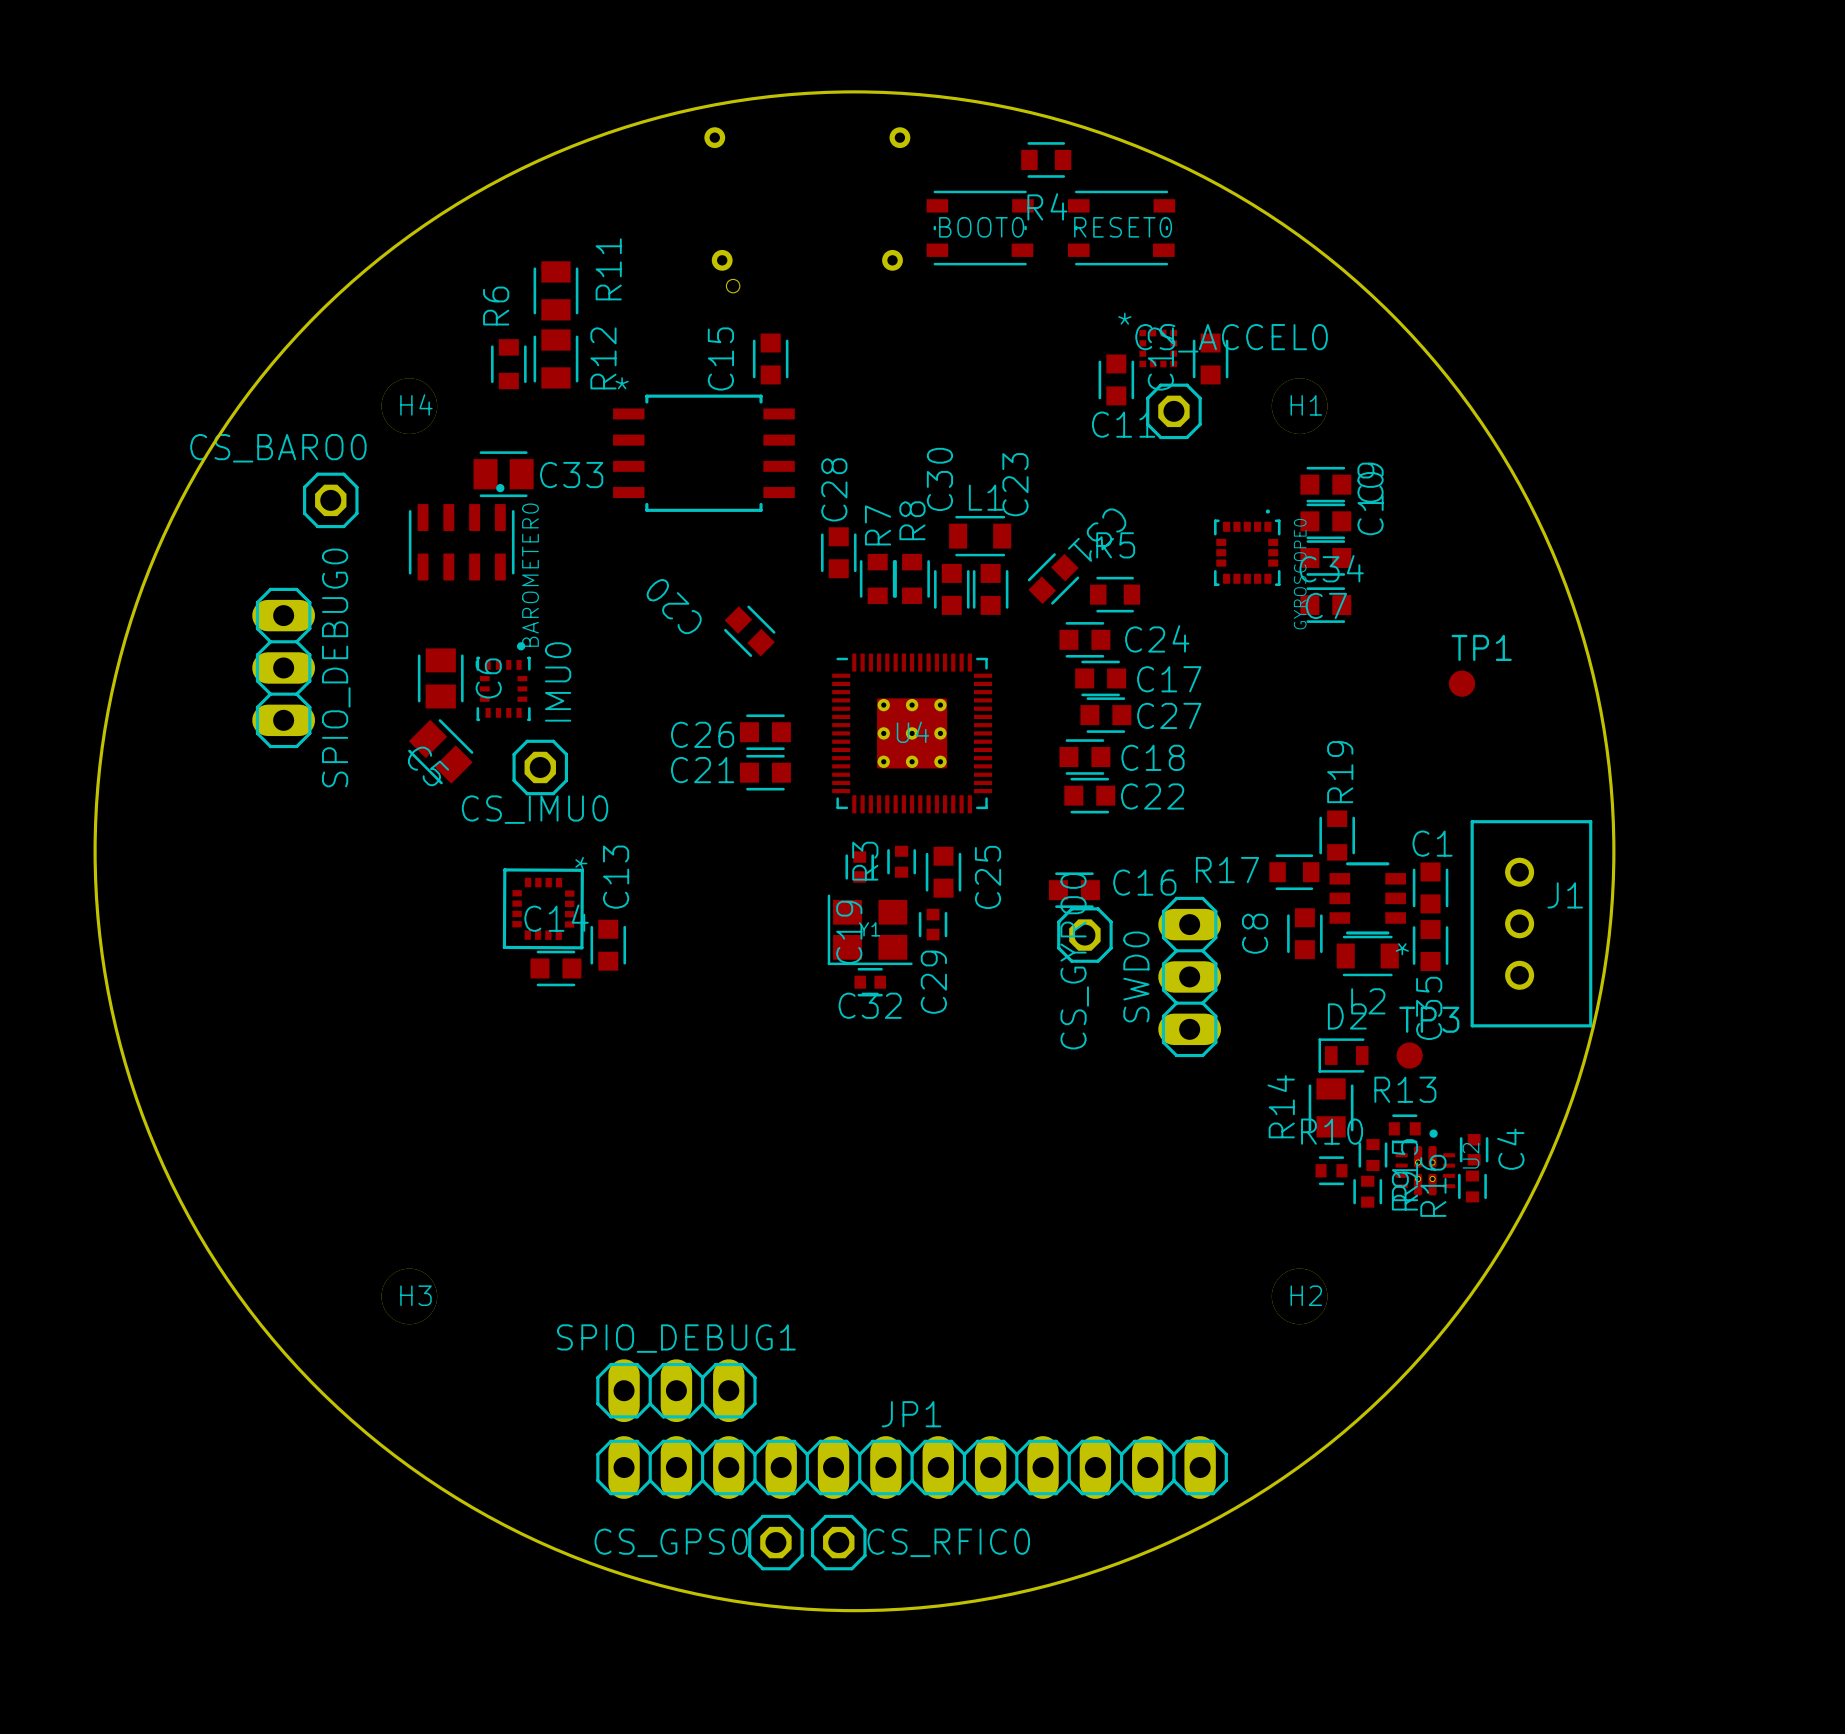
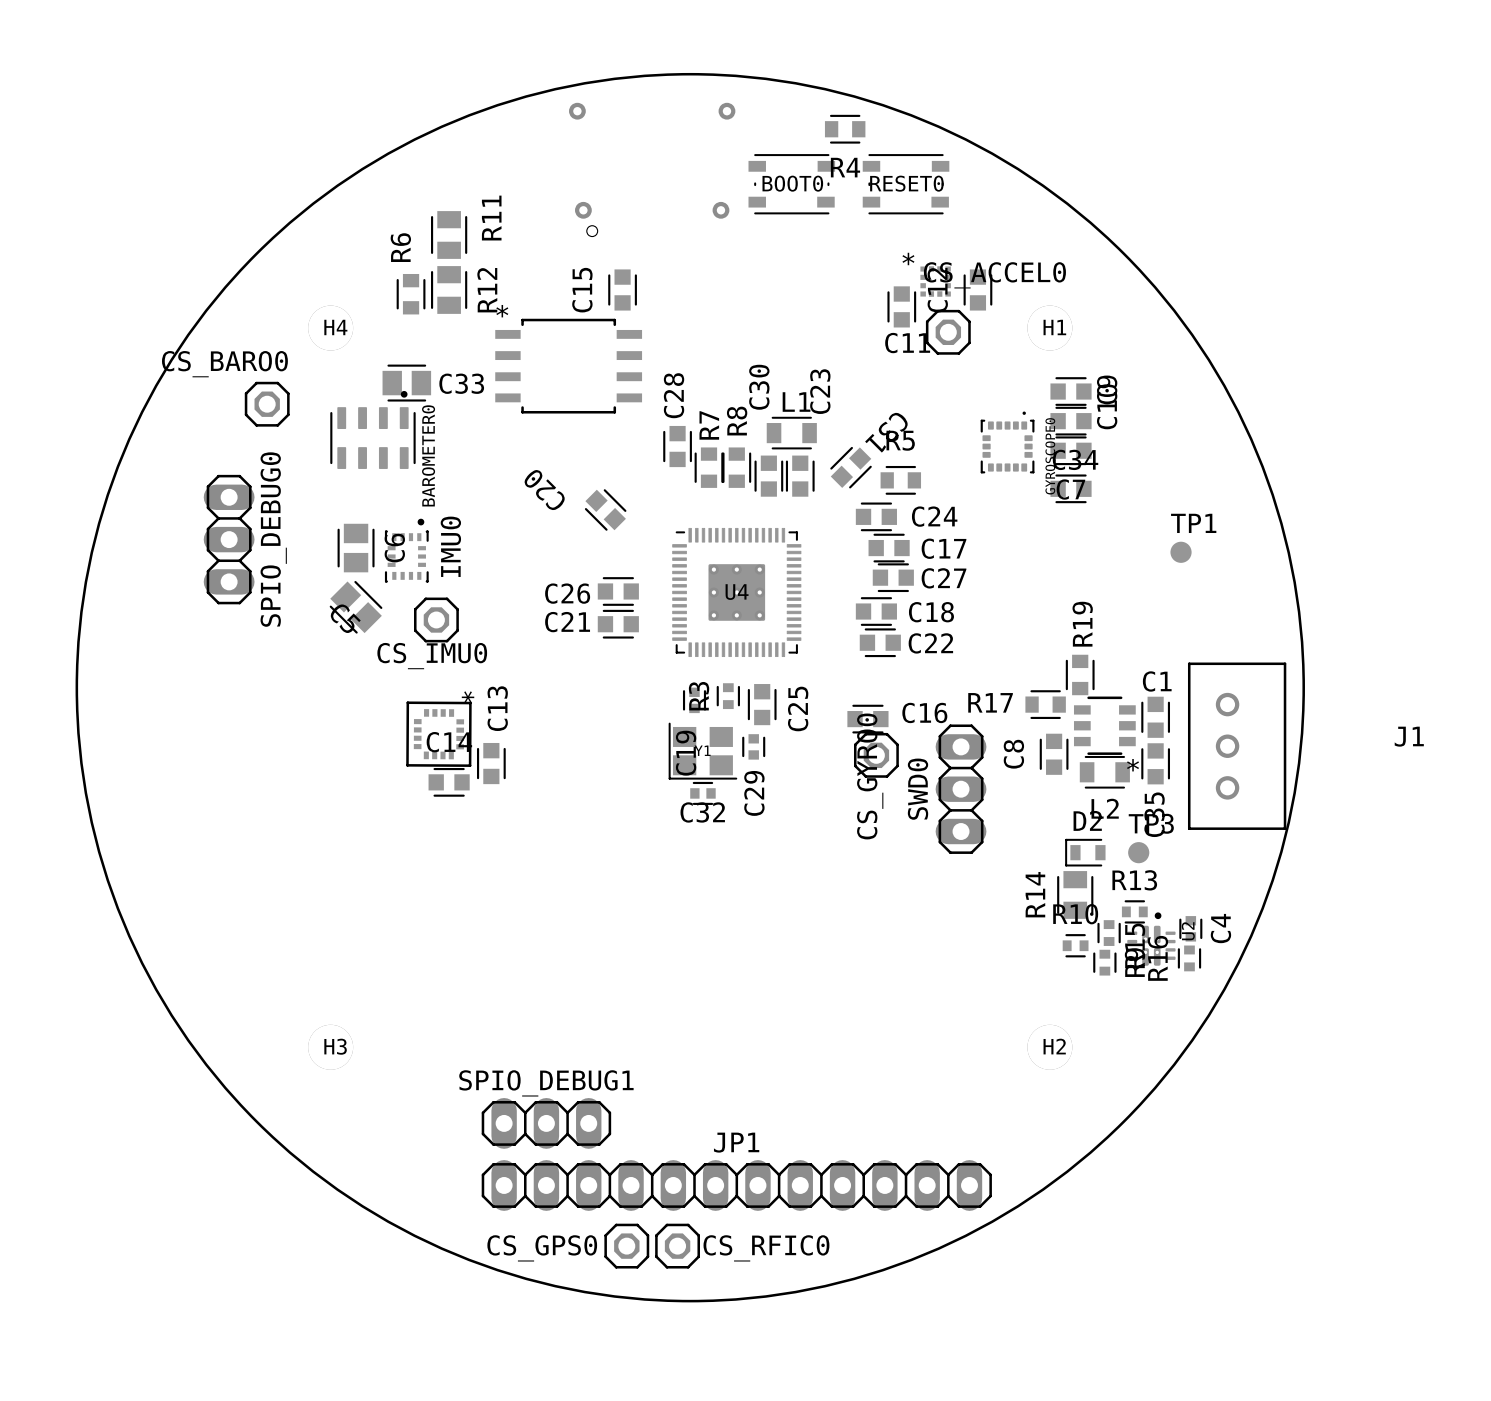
J1 name position: J1 (1565, 895) -> J1 (1409, 736)

